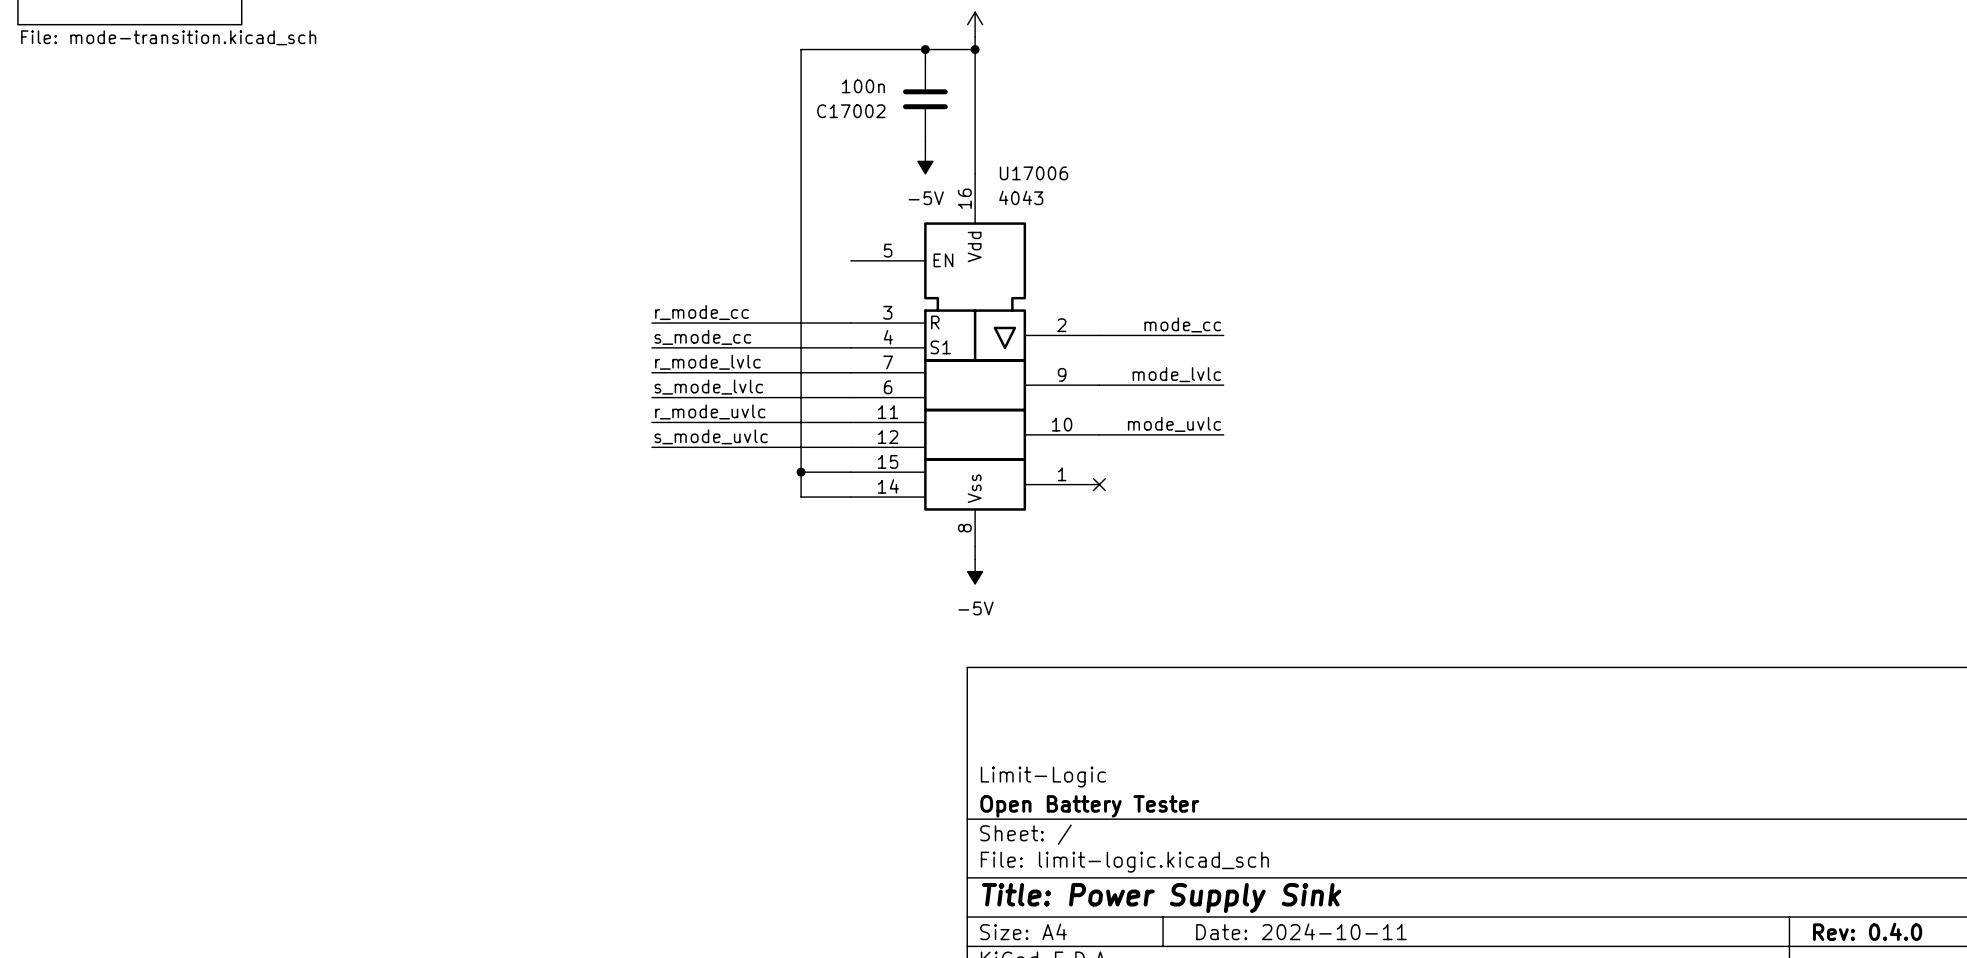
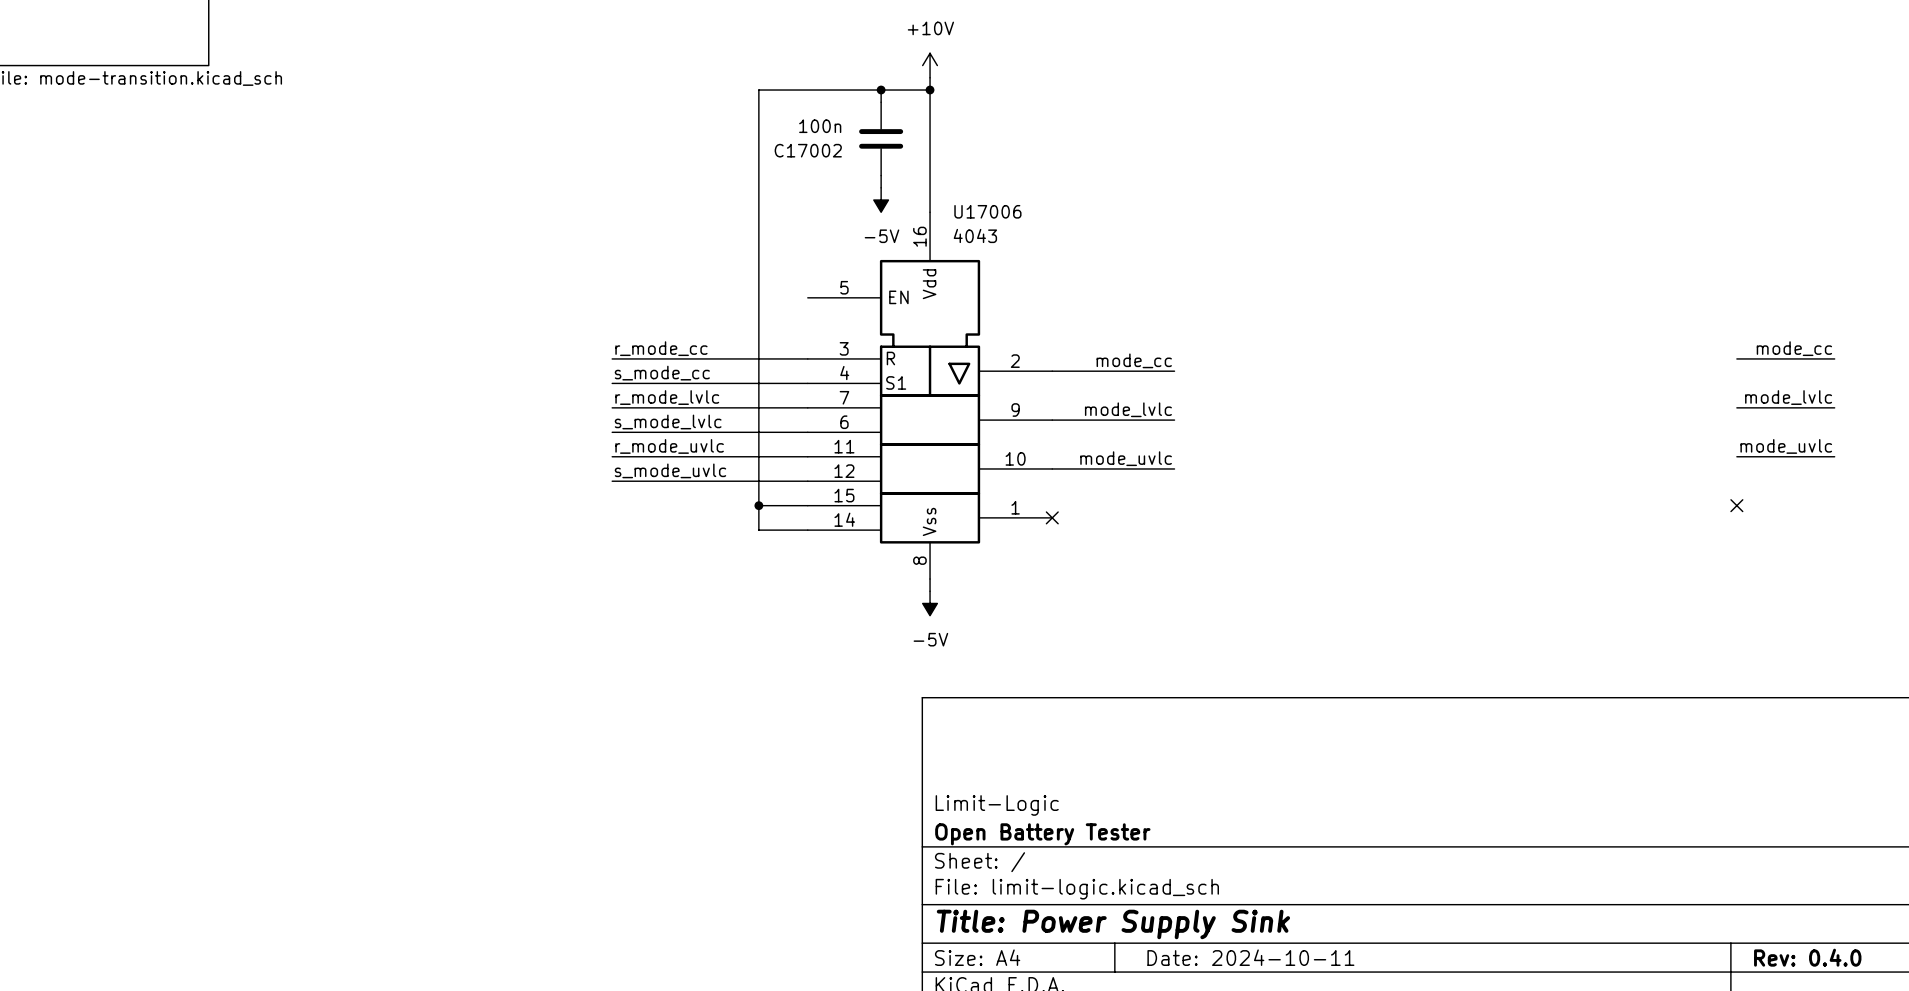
label: none -> mode_cc (1794, 348)
wire: none -> (1736, 358) (1834, 358)
label: none -> mode_lvlc (1788, 397)
wire: none -> (1736, 407) (1834, 407)
label: none -> mode_uvlc (1786, 446)
wire: none -> (1736, 456) (1834, 456)
no-connect mark: none -> (1736, 505)

